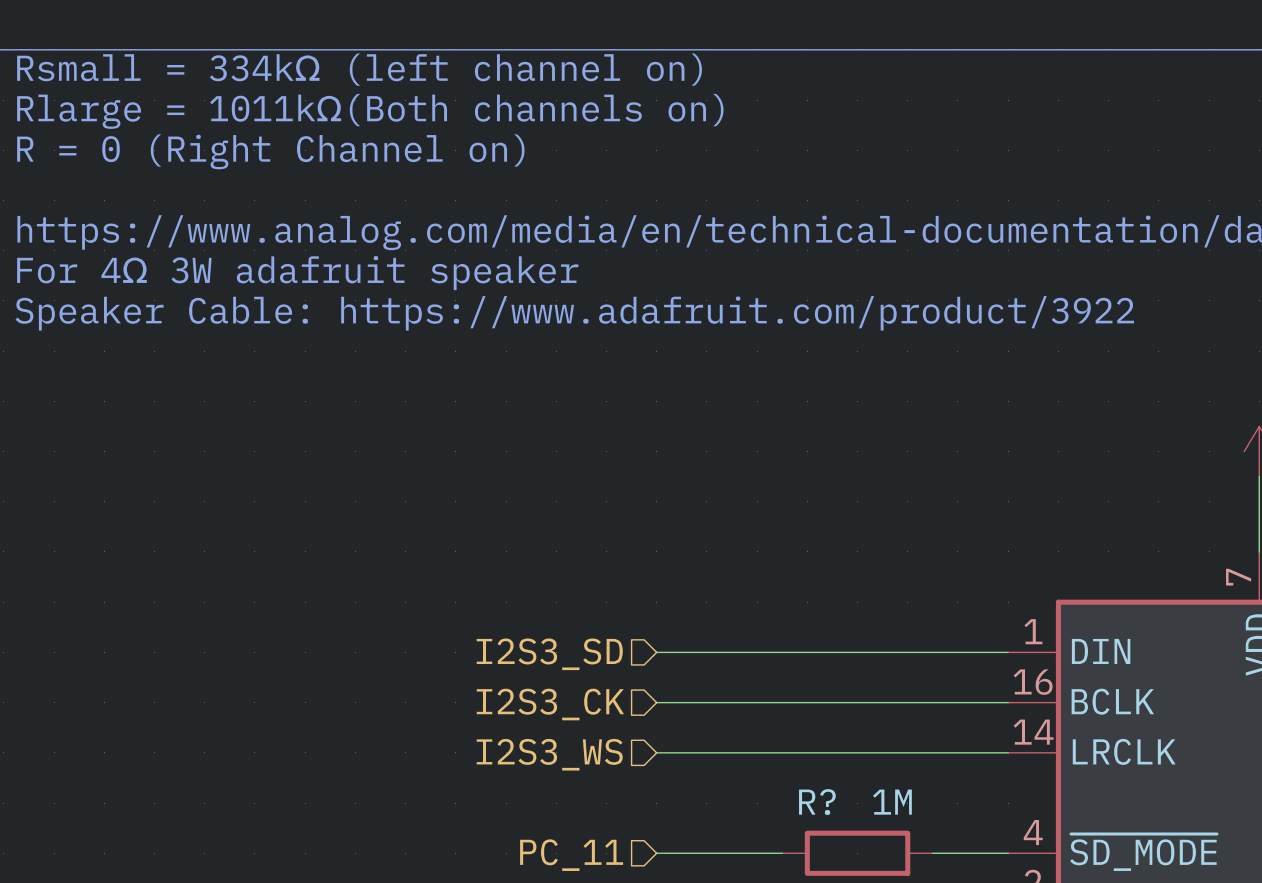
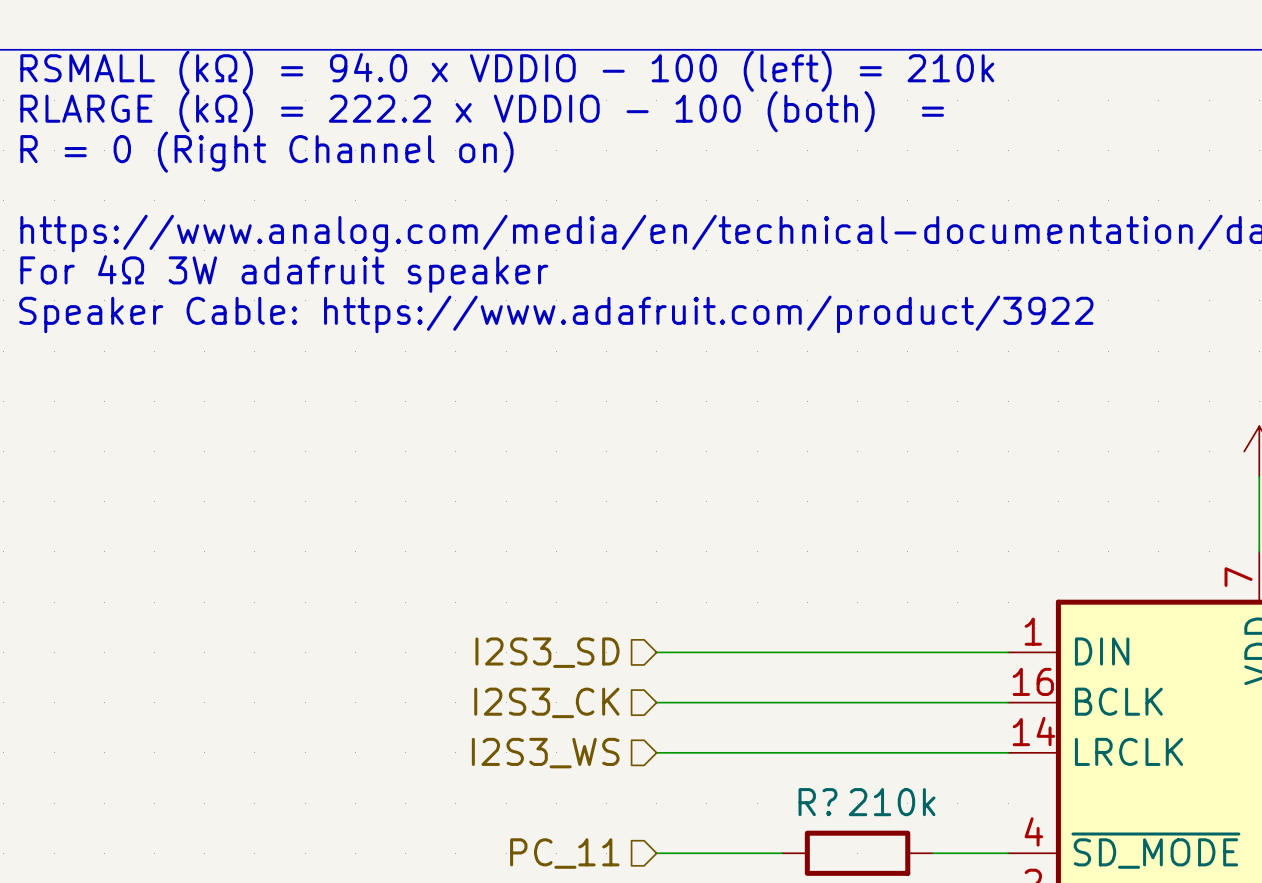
text: Rsmall = 334kΩ (left channel on) (359, 69) -> RSMALL (kΩ) = 94.0 x VDDIO - 100 (left) = 210k (507, 71)
text: Rlarge = 1011kΩ(Both channels on) (370, 111) -> RLARGE (kΩ) = 222.2 x VDDIO - 100 (both) = (482, 111)
R? value: 1M (892, 802) -> 210k (892, 802)

